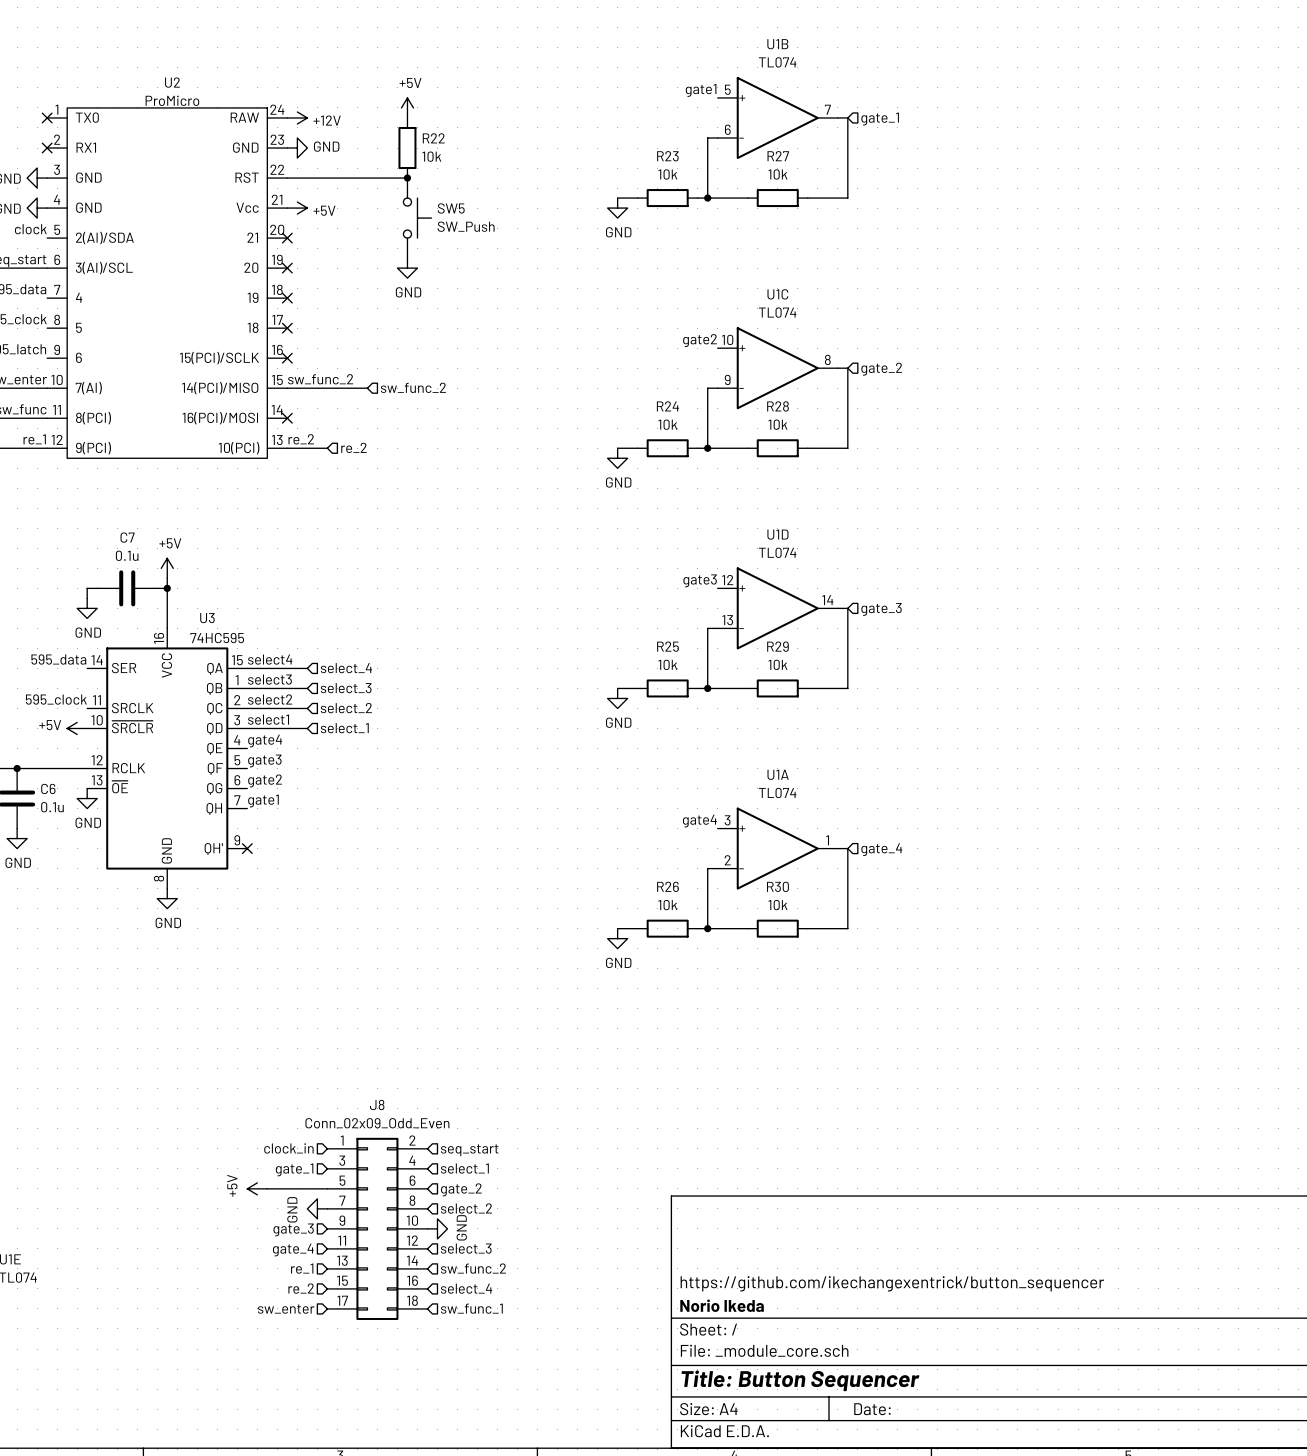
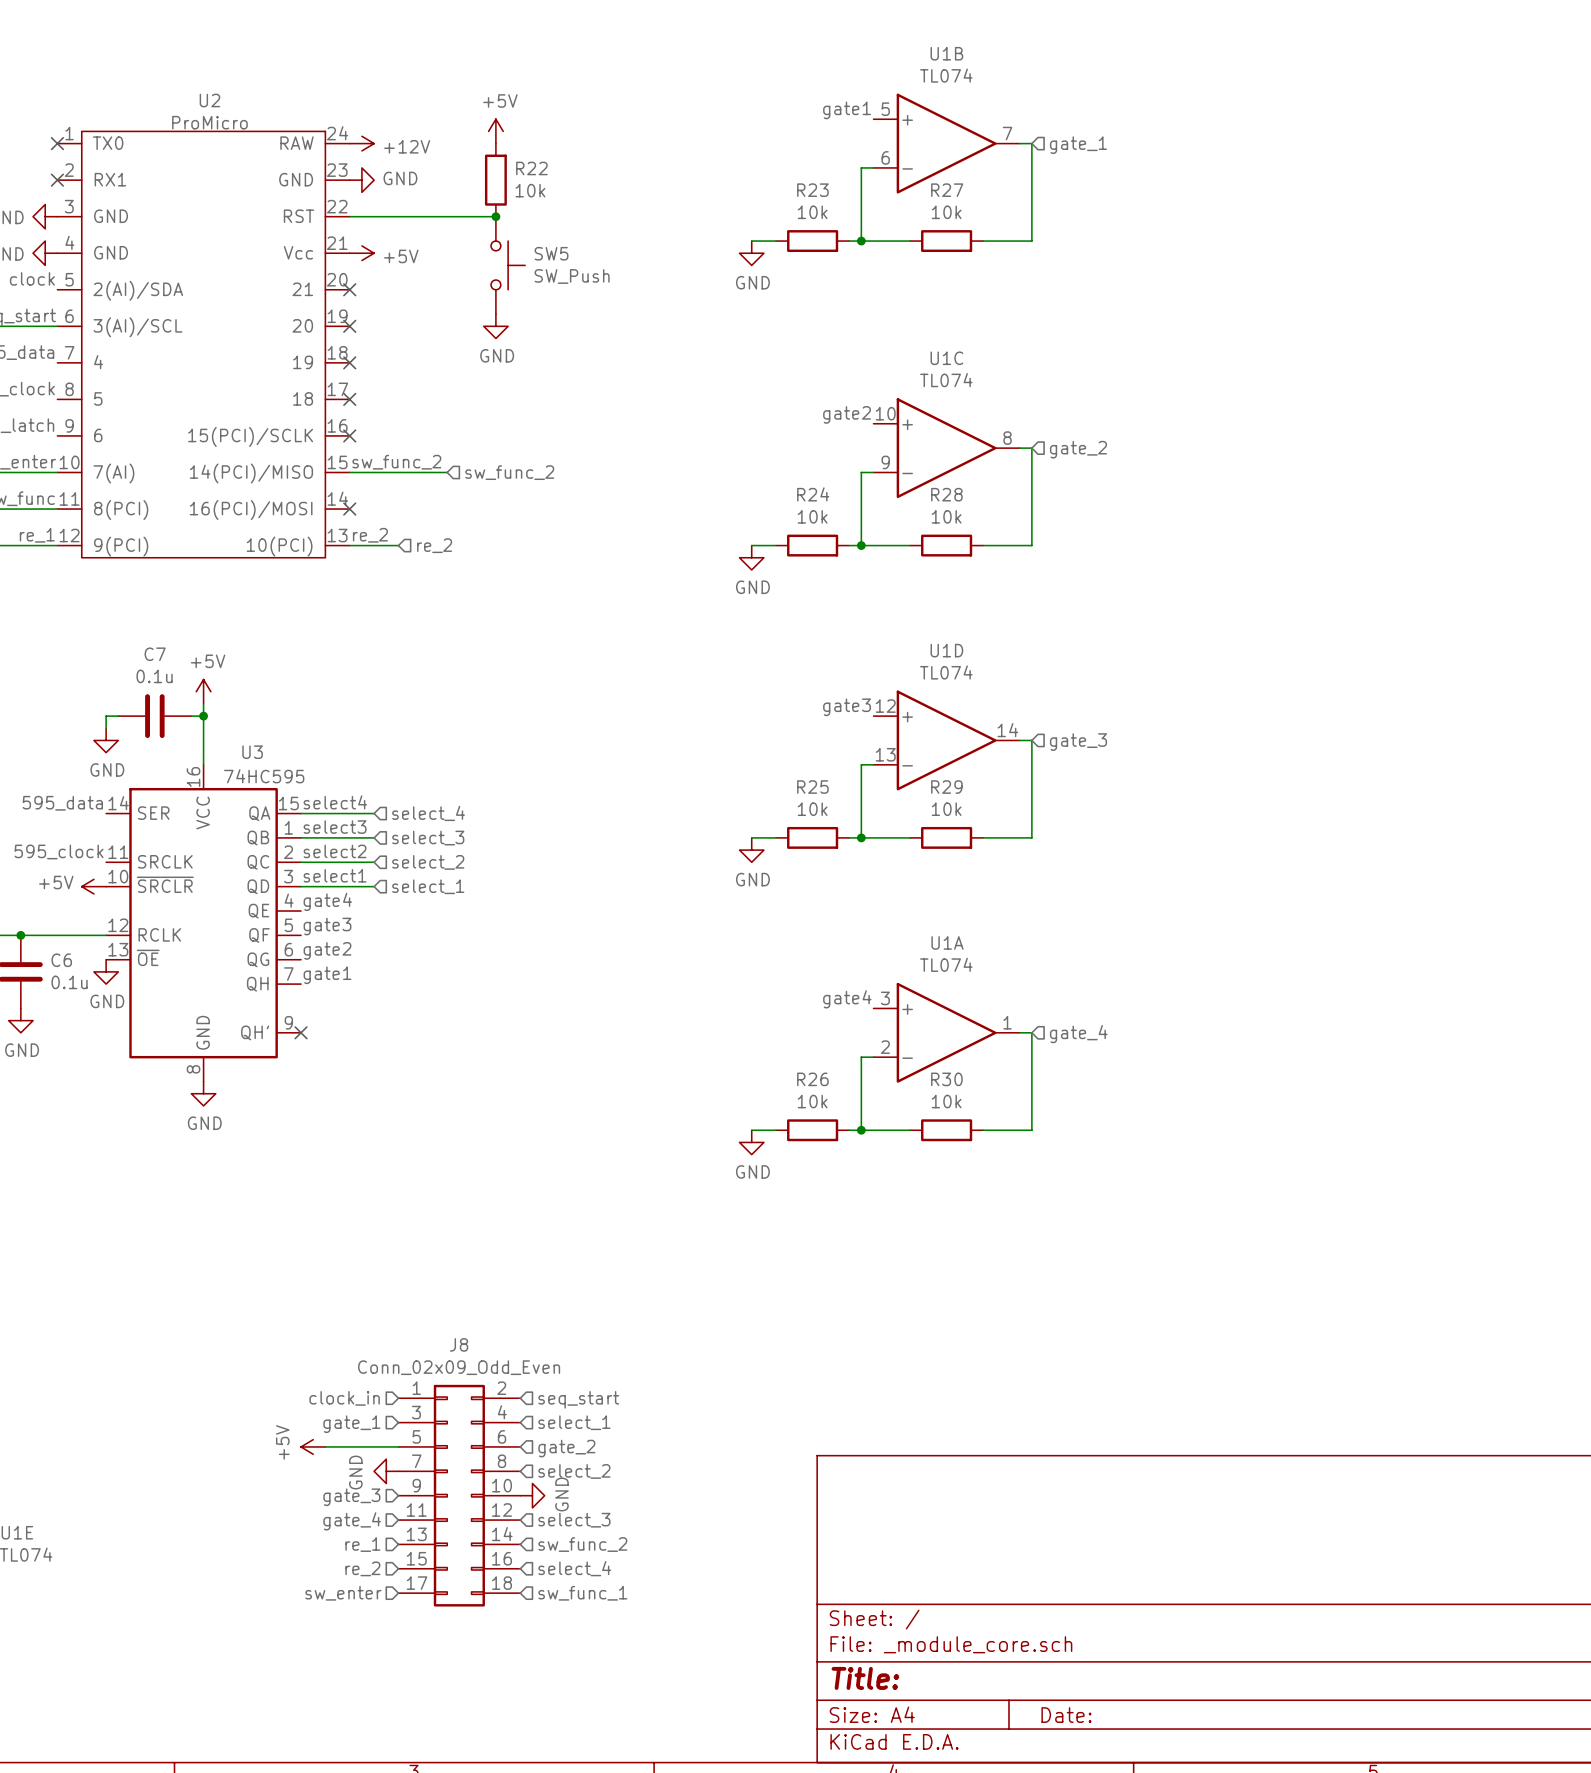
title block: https://github.com/ikechangexentrick/button_sequencer (892, 1283) -> none
title block: Norio Ikeda (722, 1305) -> none
title block: Title: Button Sequencer (800, 1380) -> Title: (865, 1678)

